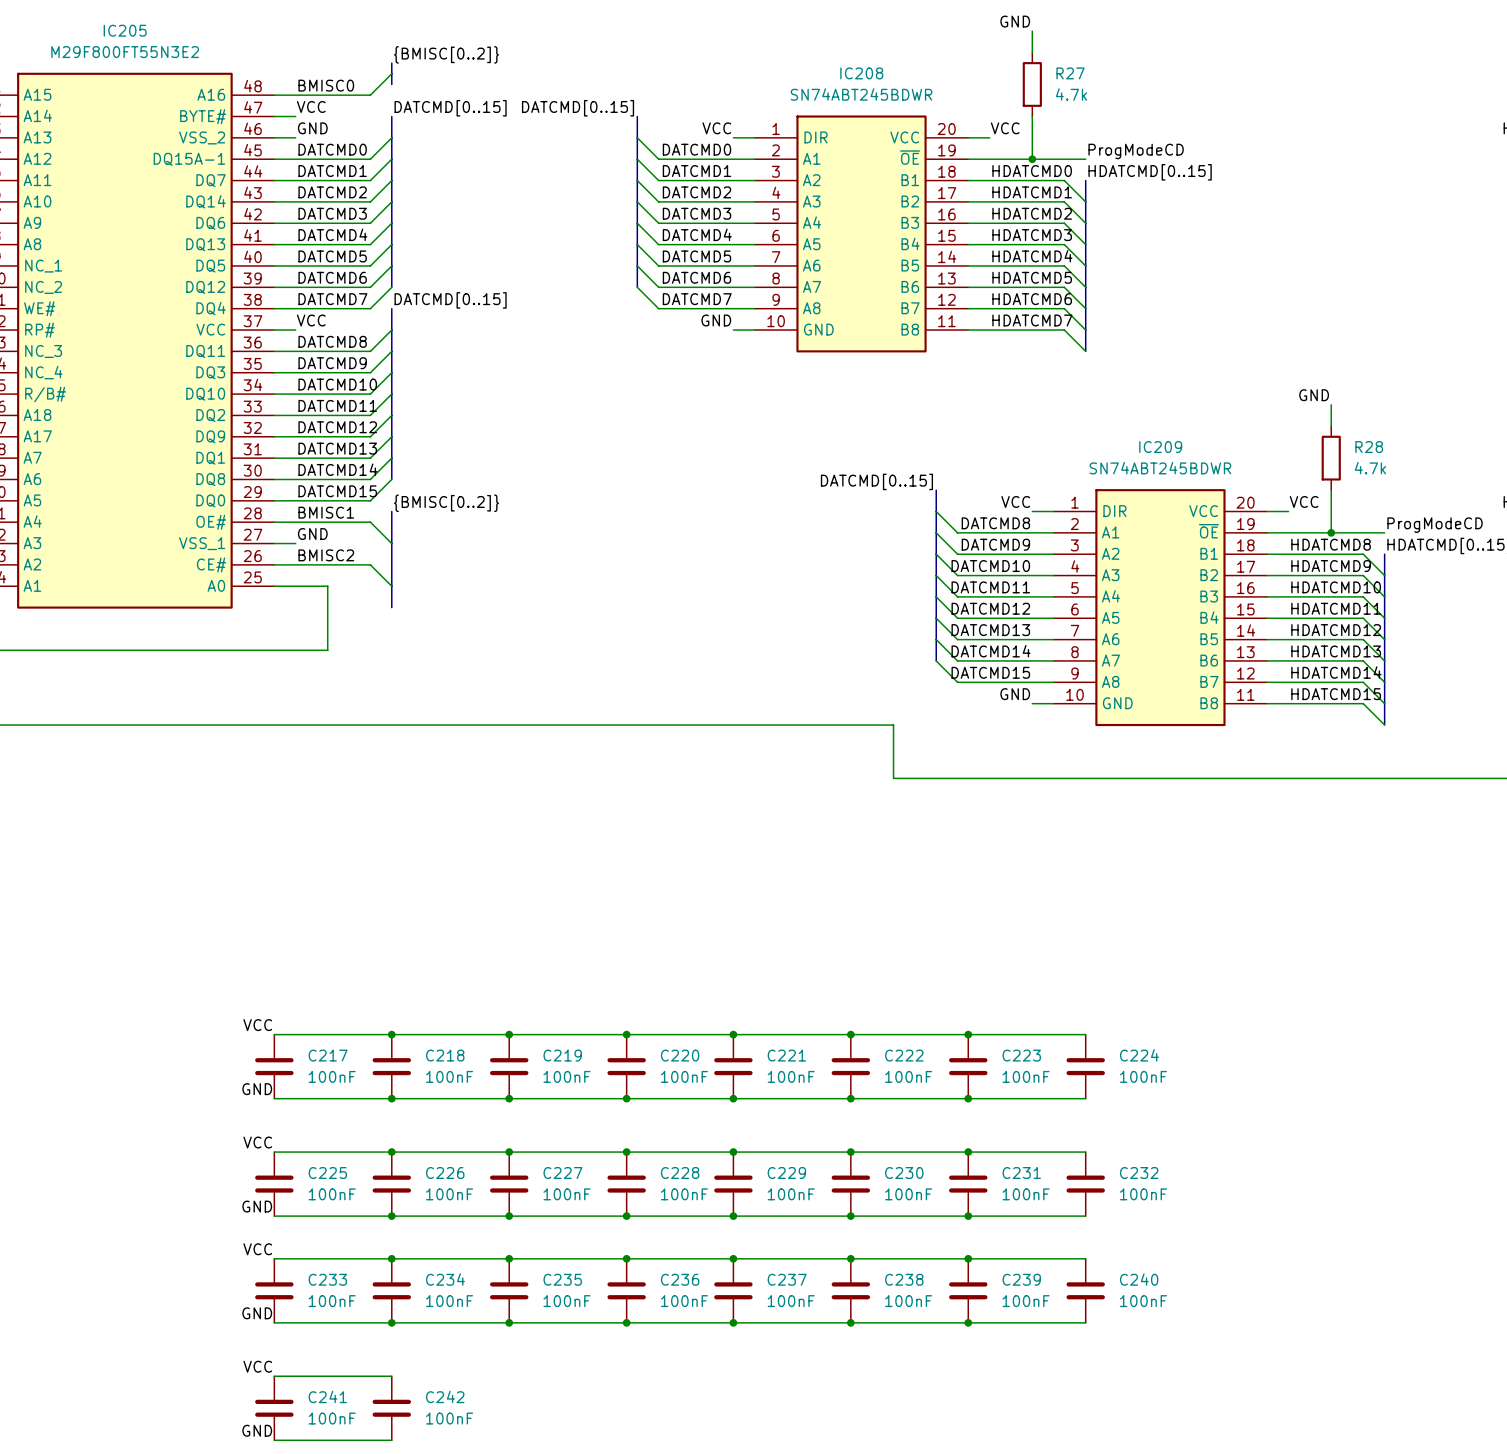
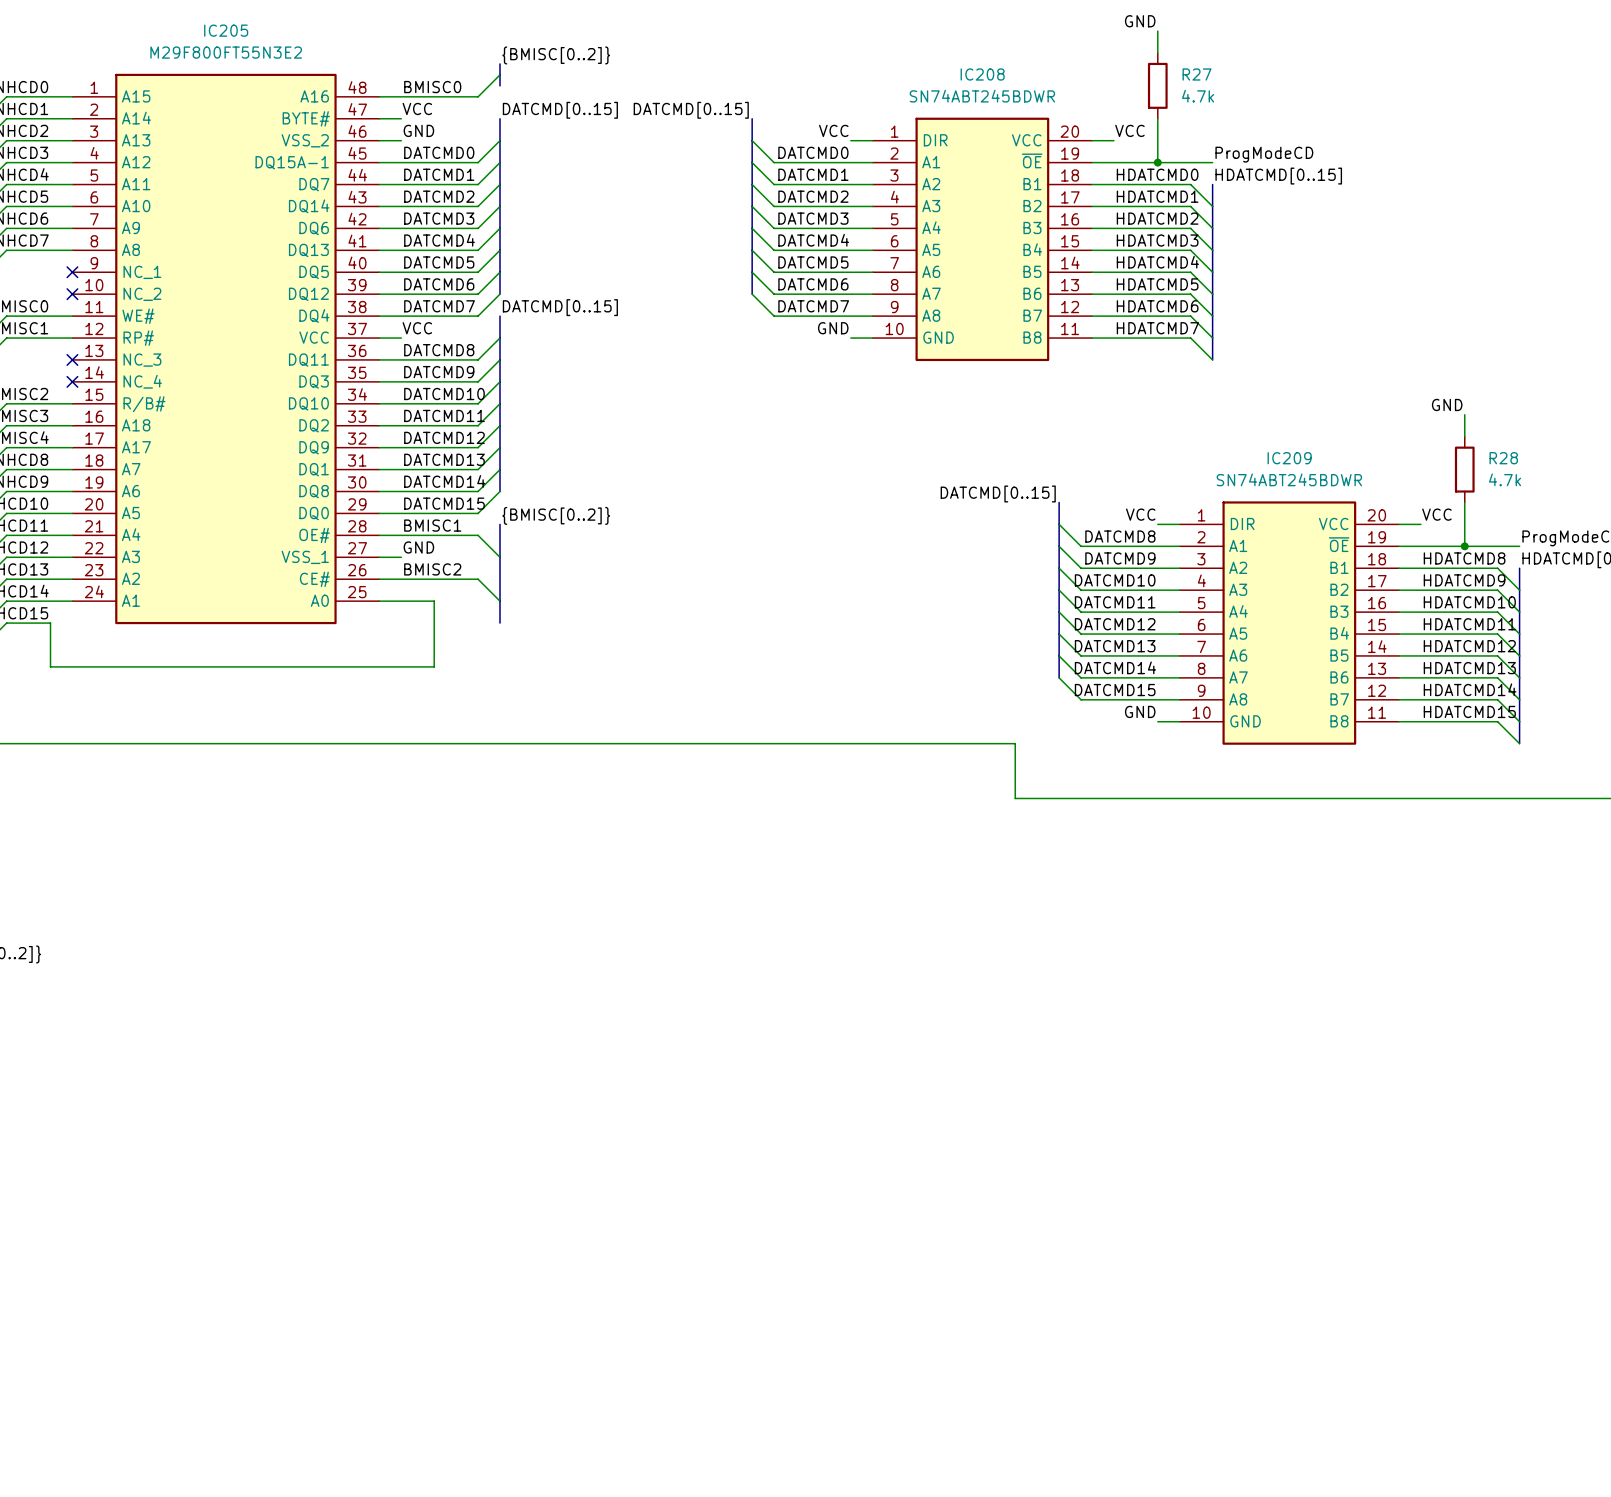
label: VCC (257, 1025) -> none
wire: (274, 1034) (1085, 1034) -> none
junction: (391, 1034) -> none
junction: (509, 1034) -> none
junction: (626, 1034) -> none
junction: (733, 1034) -> none
junction: (850, 1034) -> none
junction: (968, 1034) -> none
C217: 100nF (274, 1066) -> none
C218: 100nF (391, 1066) -> none
C219: 100nF (509, 1066) -> none
C220: 100nF (626, 1066) -> none
C221: 100nF (733, 1066) -> none
C222: 100nF (850, 1066) -> none
C223: 100nF (968, 1066) -> none
C224: 100nF (1085, 1066) -> none
label: GND (257, 1089) -> none
wire: (274, 1098) (1085, 1098) -> none
junction: (391, 1098) -> none
junction: (509, 1098) -> none
junction: (626, 1098) -> none
junction: (733, 1098) -> none
junction: (850, 1098) -> none
junction: (968, 1098) -> none
label: VCC (257, 1142) -> none
wire: (274, 1152) (1085, 1152) -> none
junction: (391, 1152) -> none
junction: (509, 1152) -> none
junction: (626, 1152) -> none
junction: (733, 1152) -> none
junction: (850, 1152) -> none
junction: (968, 1152) -> none
C225: 100nF (274, 1184) -> none
C226: 100nF (391, 1184) -> none
C227: 100nF (509, 1184) -> none
C228: 100nF (626, 1184) -> none
C229: 100nF (733, 1184) -> none
C230: 100nF (850, 1184) -> none
C231: 100nF (968, 1184) -> none
C232: 100nF (1085, 1184) -> none
label: GND (257, 1206) -> none
wire: (274, 1216) (1085, 1216) -> none
junction: (391, 1216) -> none
junction: (509, 1216) -> none
junction: (626, 1216) -> none
junction: (733, 1216) -> none
junction: (850, 1216) -> none
junction: (968, 1216) -> none
label: VCC (257, 1249) -> none
wire: (274, 1258) (1085, 1258) -> none
junction: (391, 1258) -> none
junction: (509, 1258) -> none
junction: (626, 1258) -> none
junction: (733, 1258) -> none
junction: (850, 1258) -> none
junction: (968, 1258) -> none
C233: 100nF (274, 1290) -> none
C234: 100nF (391, 1290) -> none
C235: 100nF (509, 1290) -> none
C236: 100nF (626, 1290) -> none
C237: 100nF (733, 1290) -> none
C238: 100nF (850, 1290) -> none
C239: 100nF (968, 1290) -> none
C240: 100nF (1085, 1290) -> none
label: GND (257, 1313) -> none
wire: (274, 1322) (1085, 1322) -> none
junction: (391, 1322) -> none
junction: (509, 1322) -> none
junction: (626, 1322) -> none
junction: (733, 1322) -> none
junction: (850, 1322) -> none
junction: (968, 1322) -> none
label: VCC (257, 1366) -> none
wire: (274, 1376) (391, 1376) -> none
C241: 100nF (274, 1408) -> none
C242: 100nF (391, 1408) -> none
label: GND (257, 1430) -> none
wire: (274, 1440) (391, 1440) -> none

